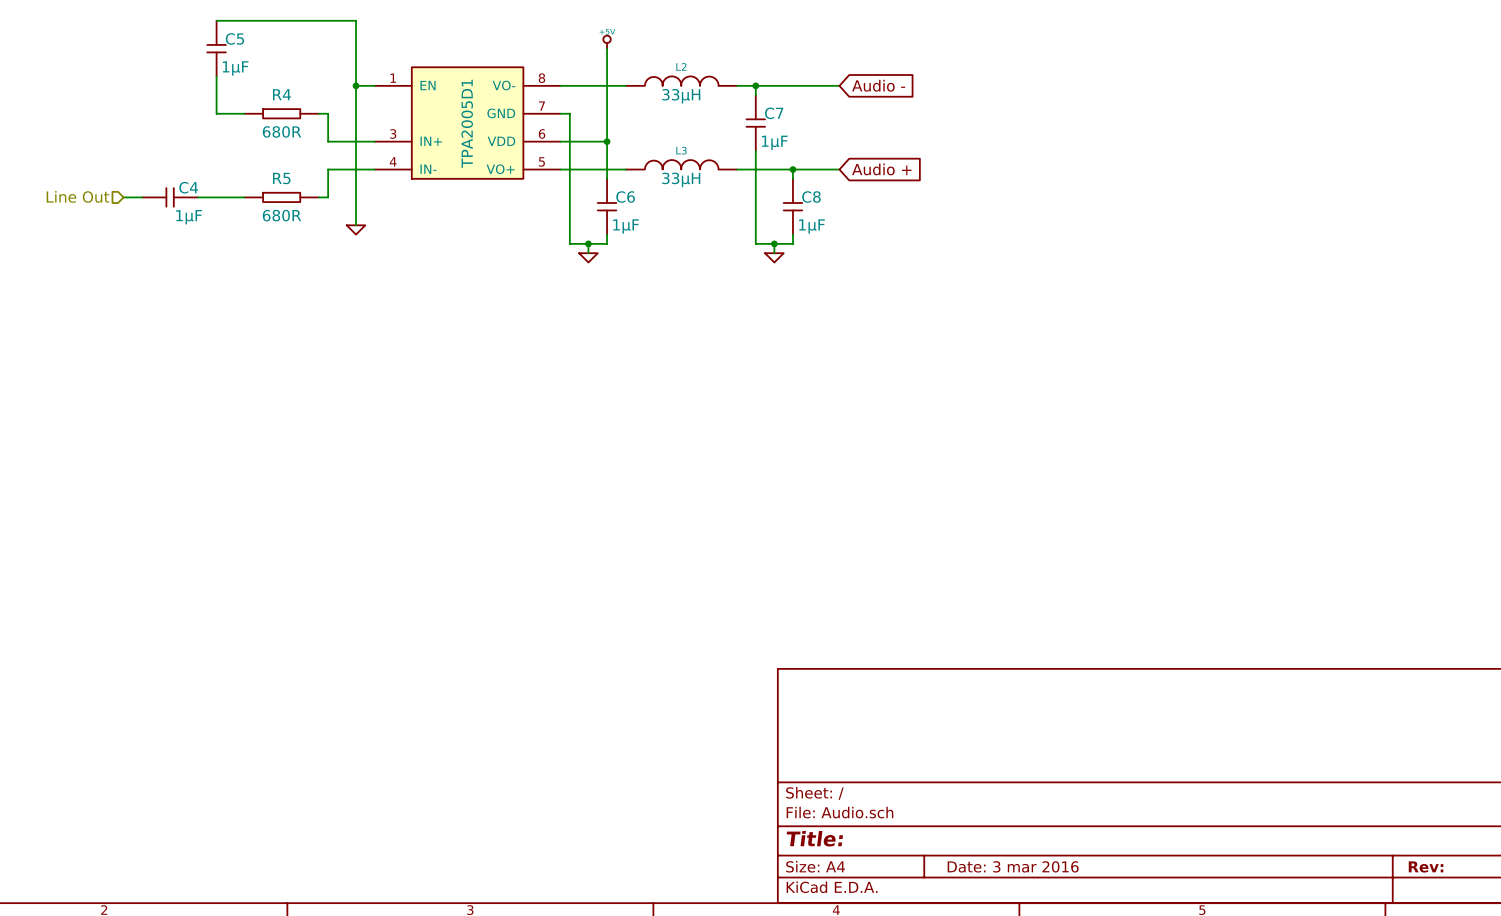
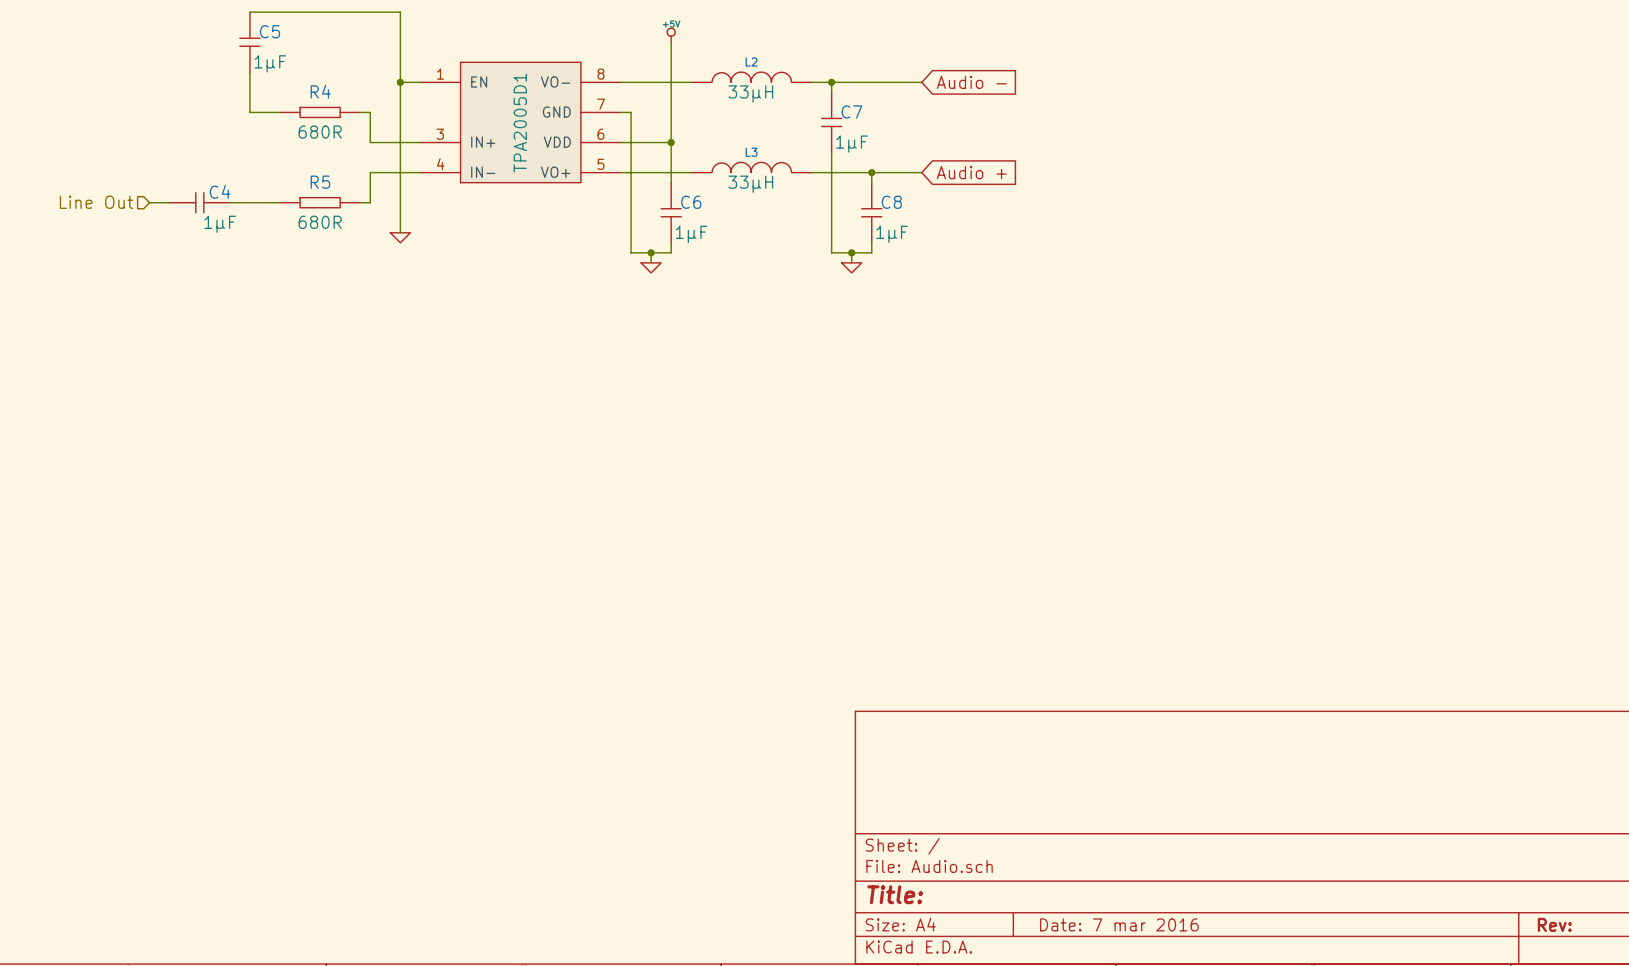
title block: Date: 3 mar 2016 (1013, 866) -> Date: 7 mar 2016 (1119, 924)

